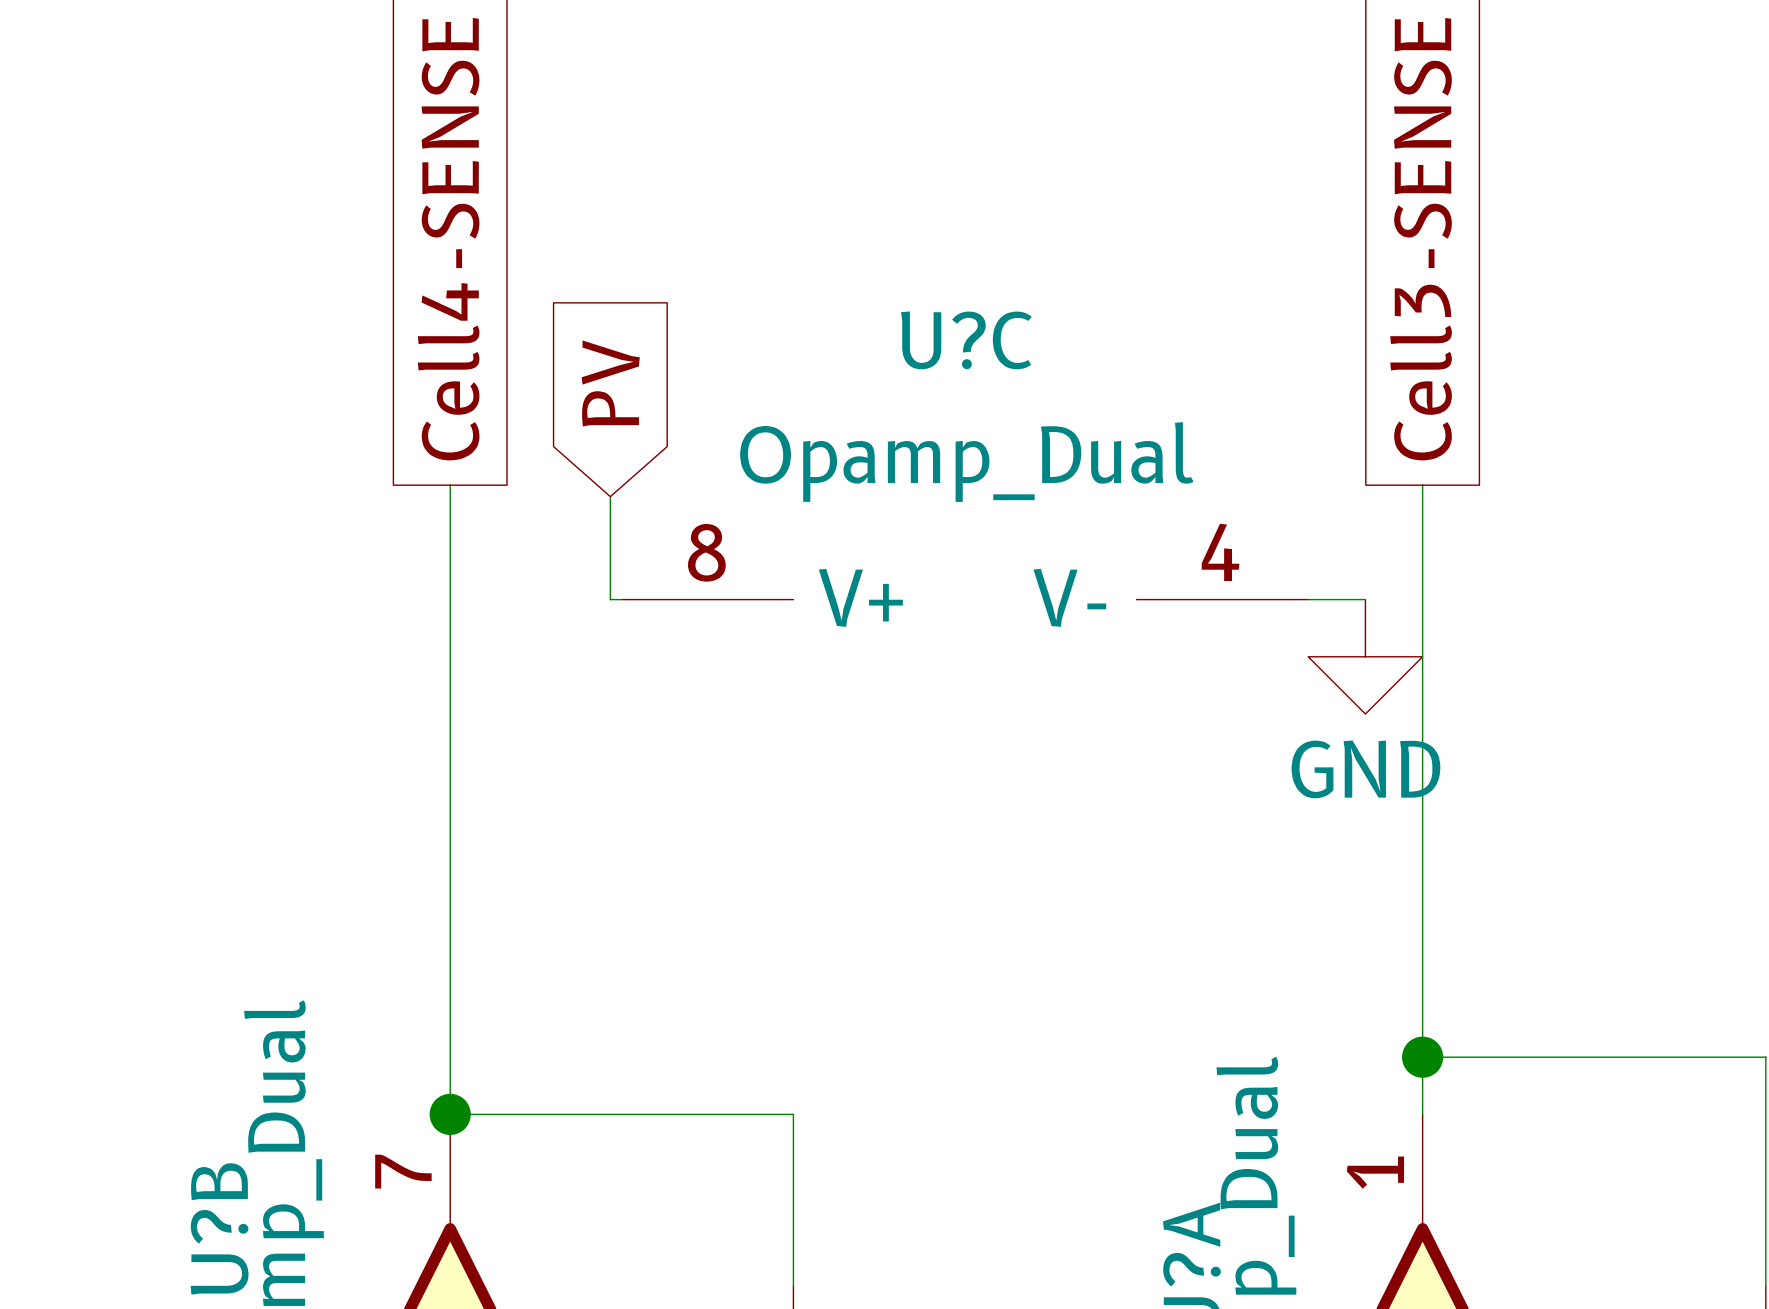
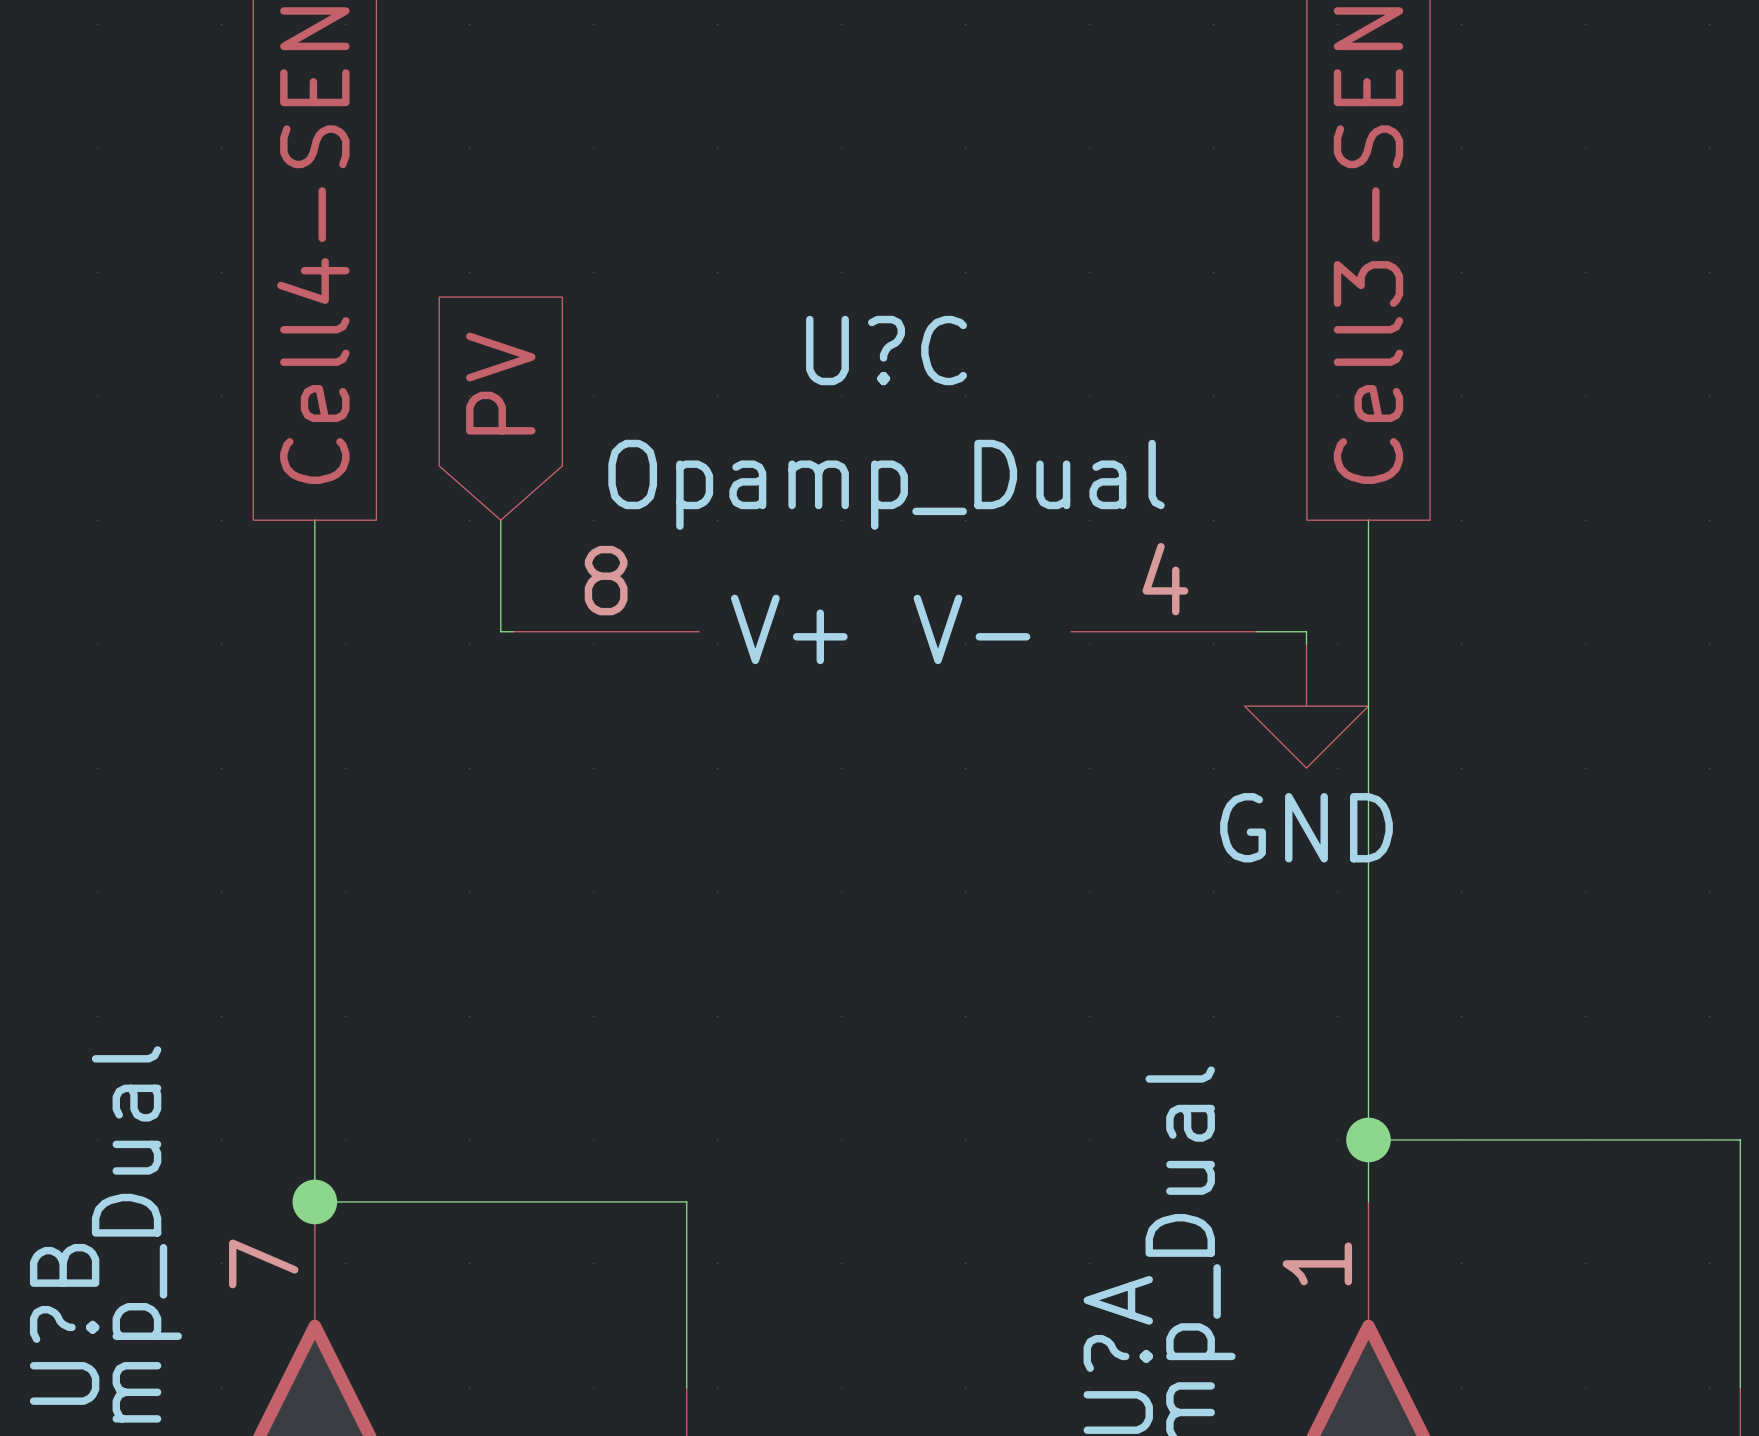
global label position: PV (610, 383) -> PV (500, 383)
wire: (610, 496) (610, 599) (621, 599) -> (500, 520) (500, 631) (513, 631)
U?C position: (965, 599) -> (885, 631)
wire: (1308, 599) (1365, 599) -> (1256, 631) (1306, 631) (1306, 644)

